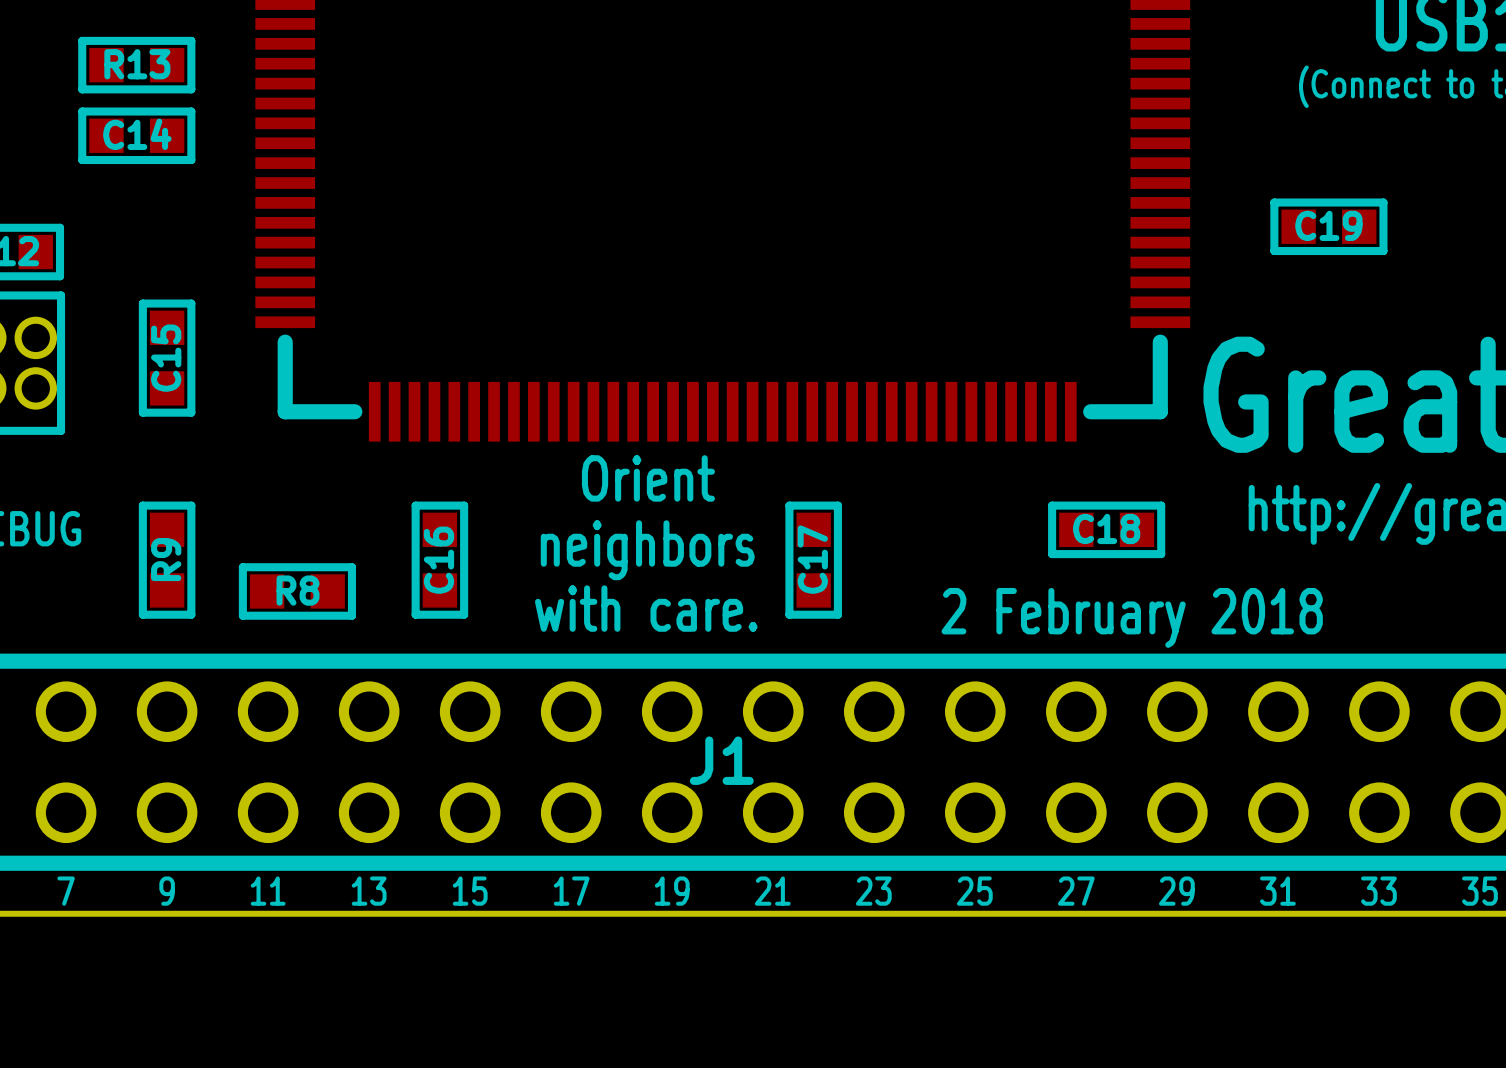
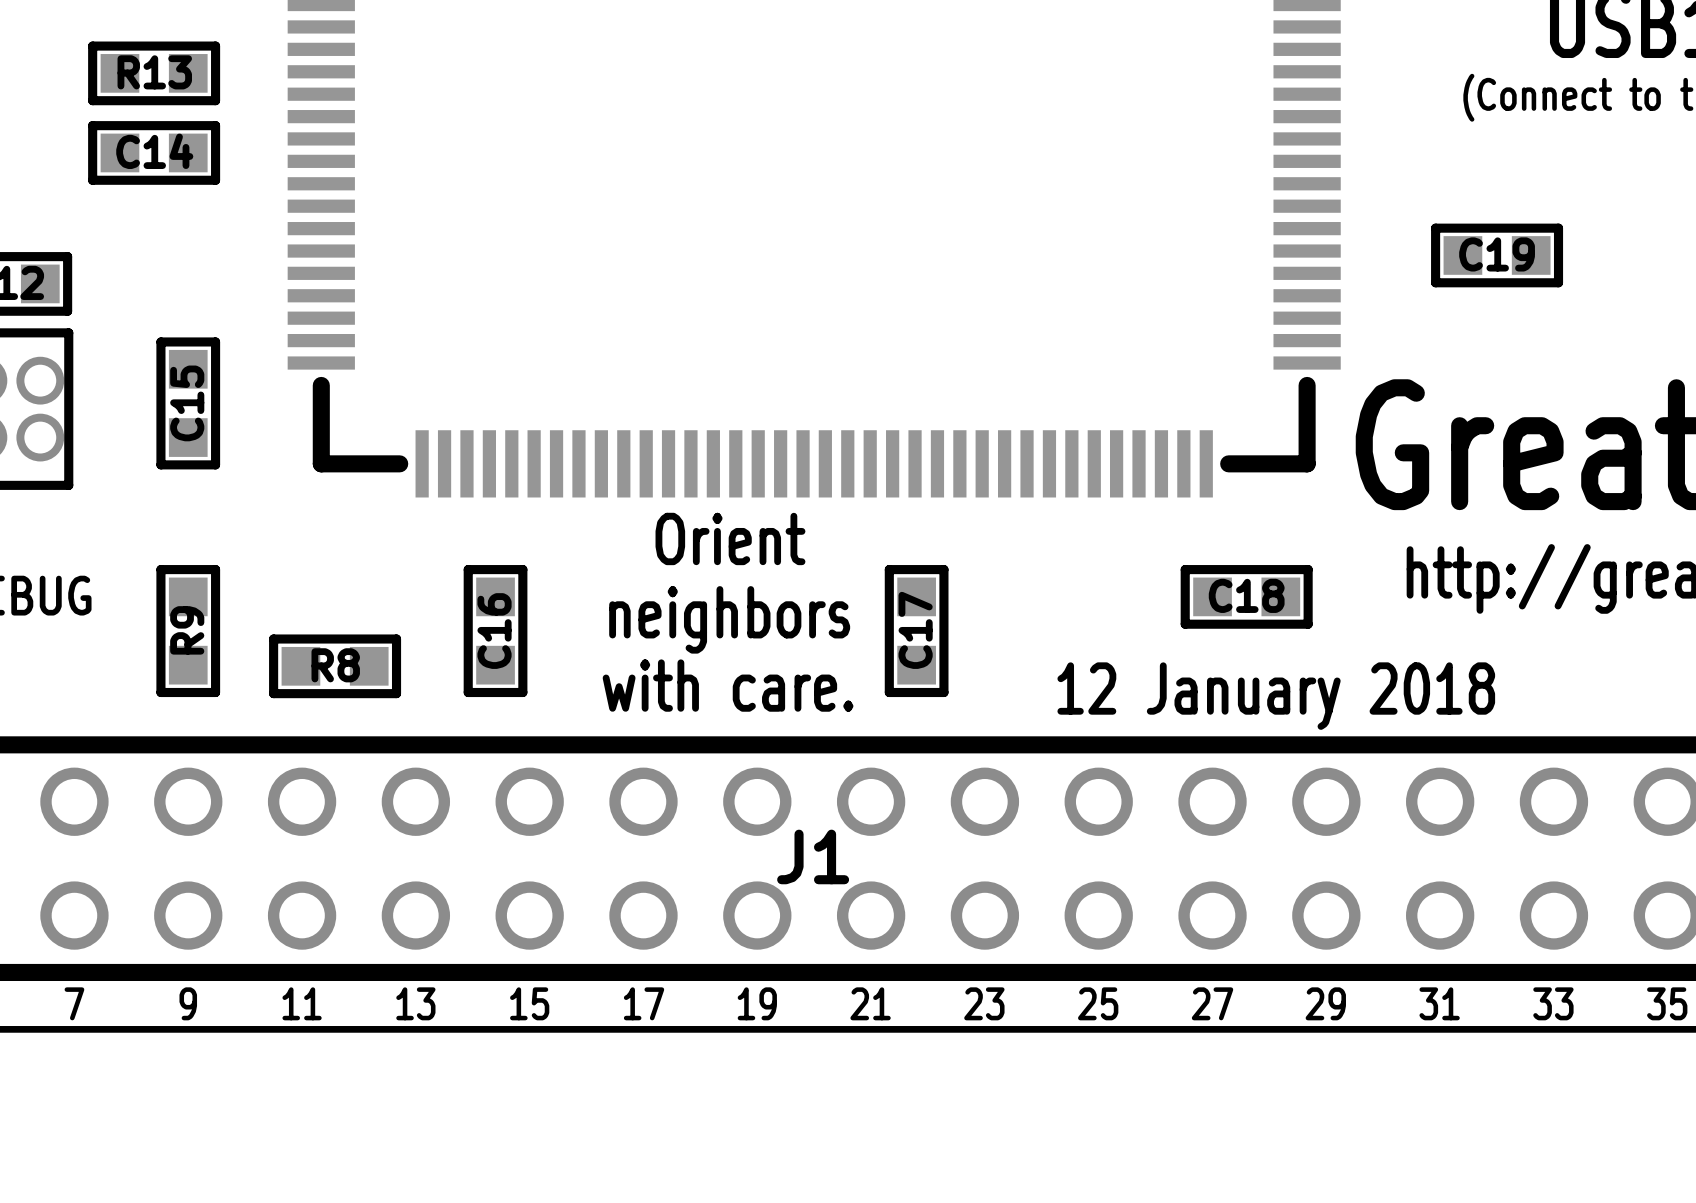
text: 2 February 2018 (1132, 617) -> 12 January 2018 (1276, 696)

